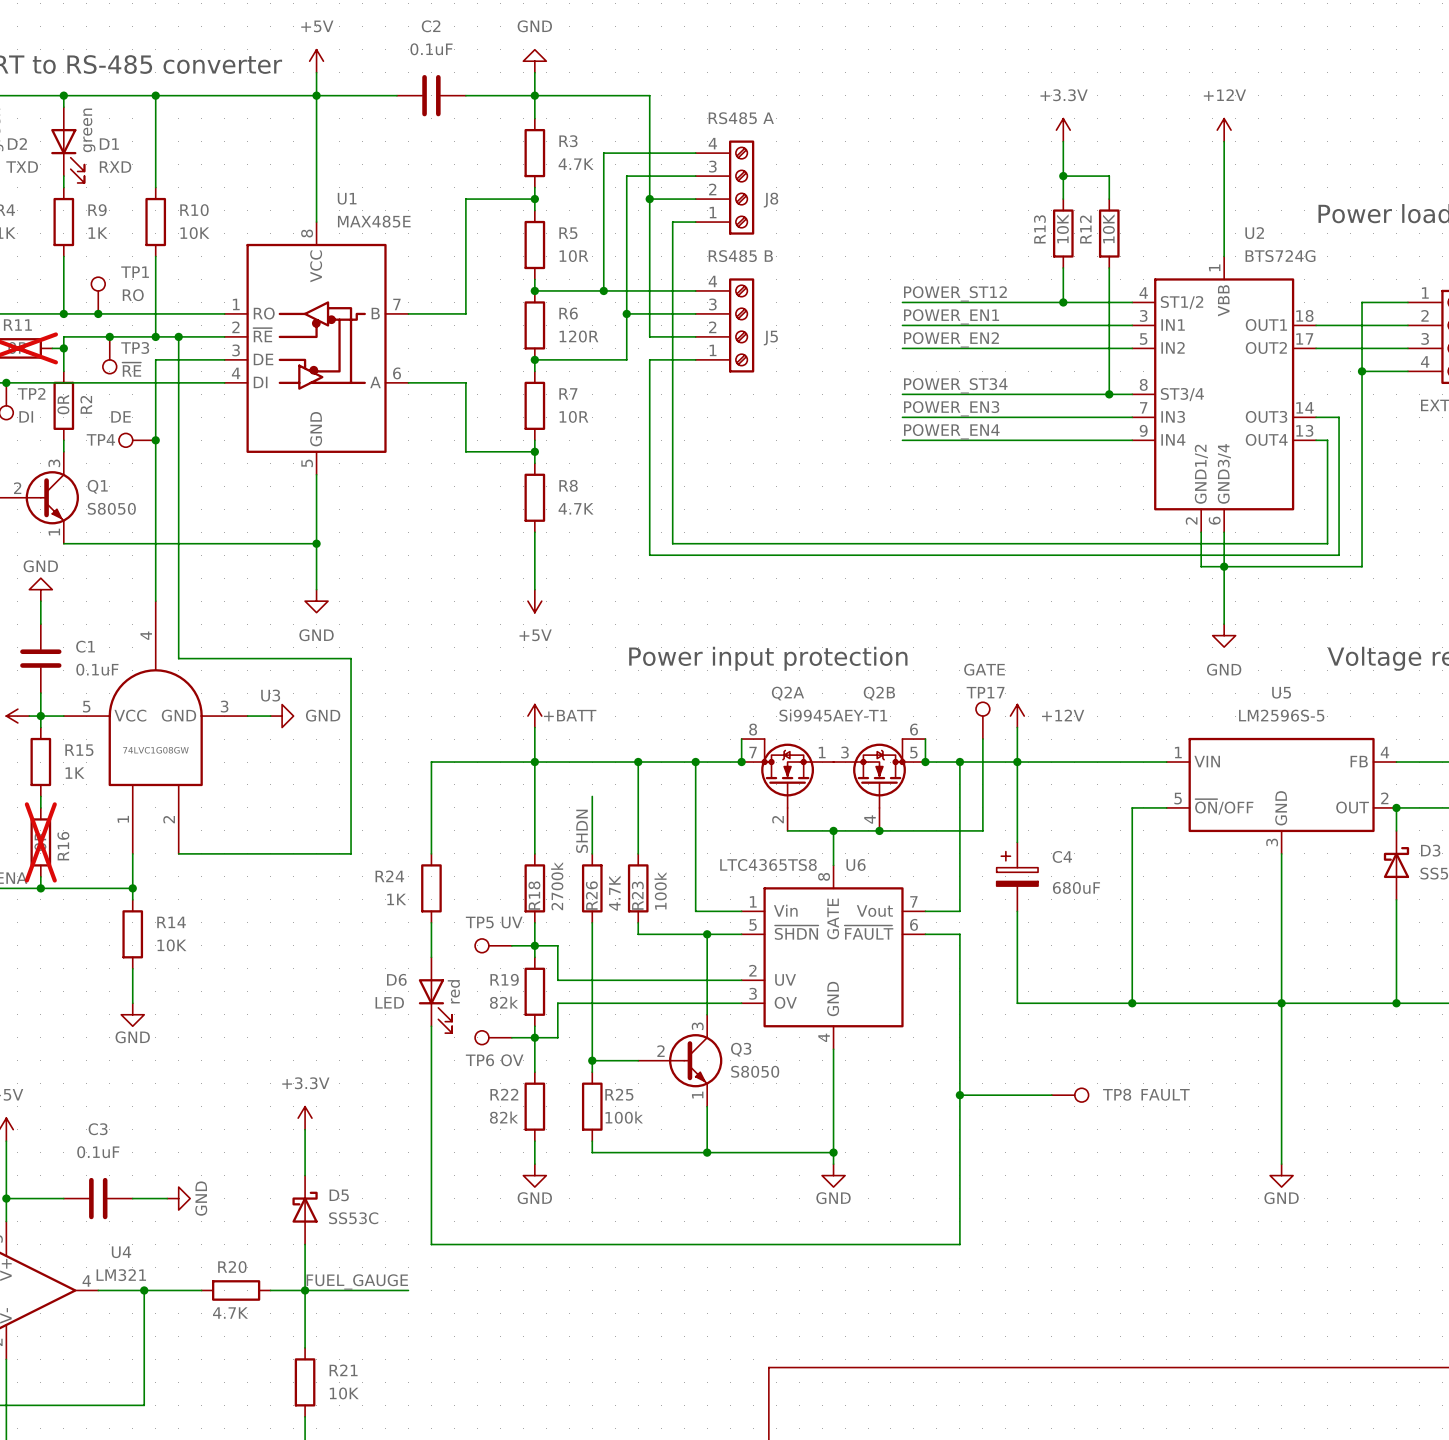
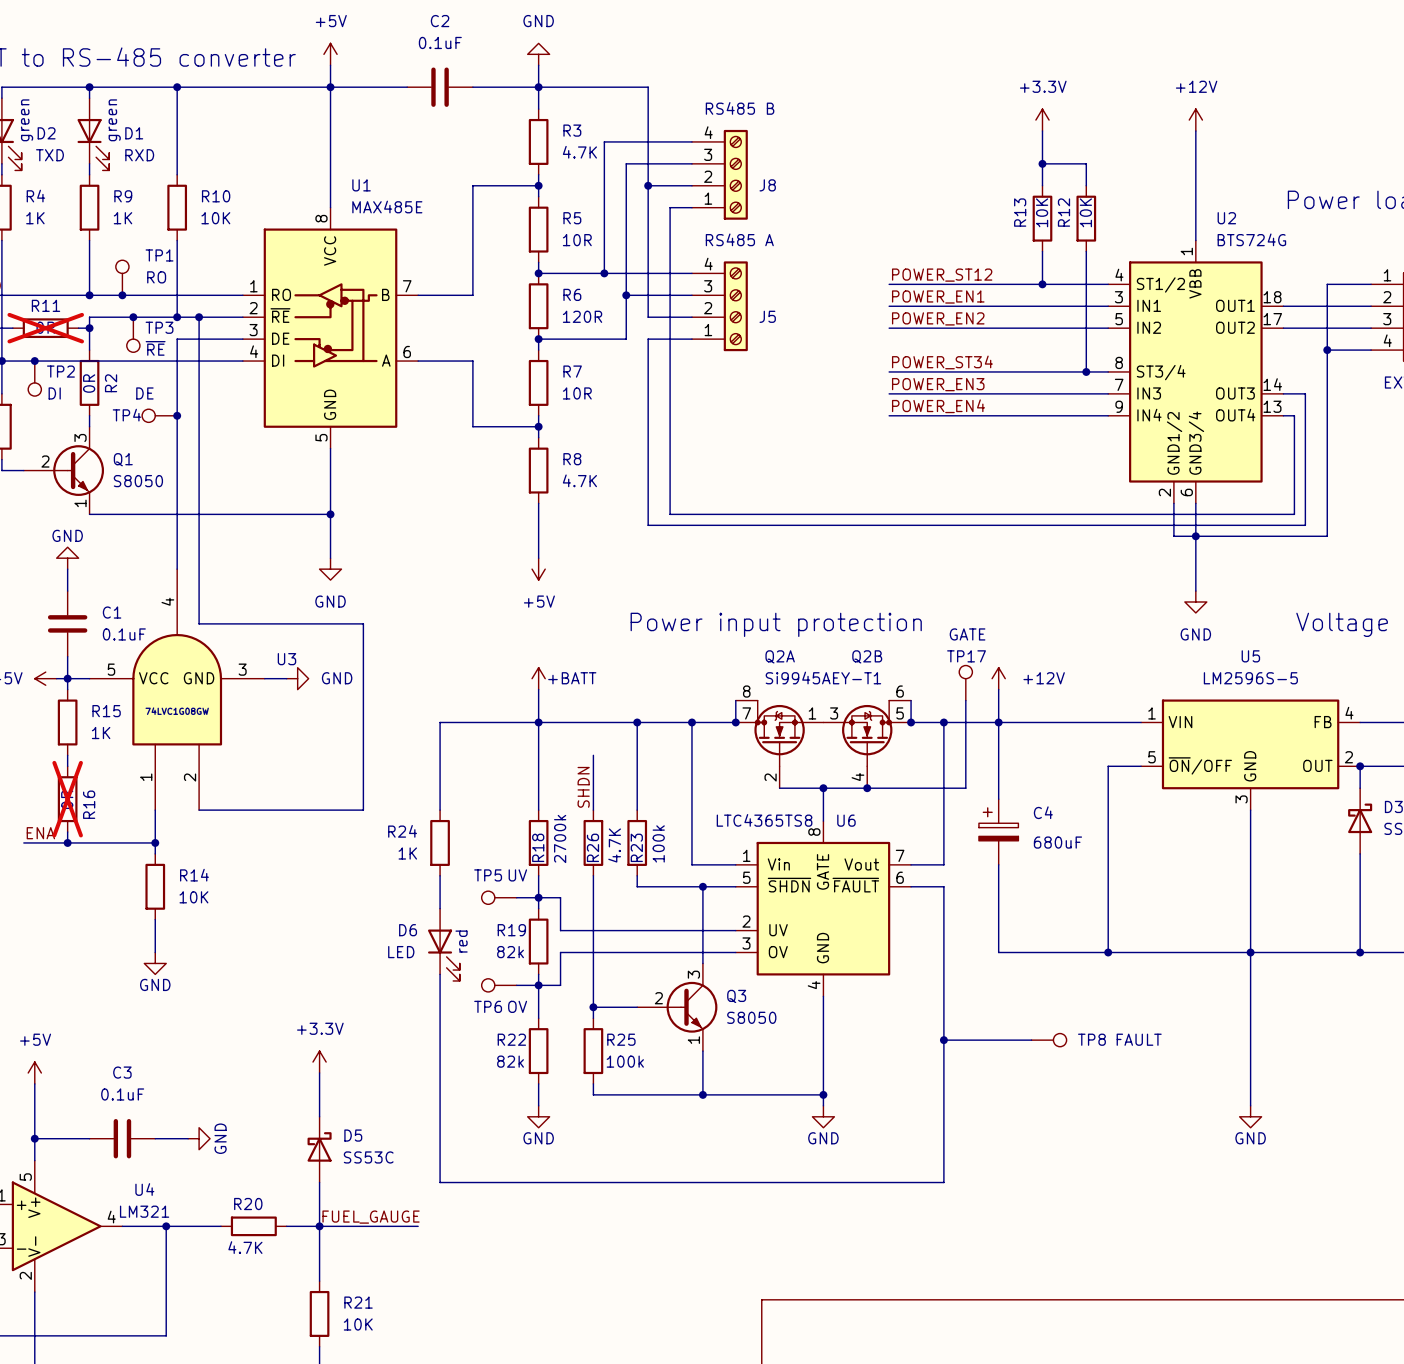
J8 value: RS485 A (741, 118) -> RS485 B (740, 108)
J5 value: RS485 B (740, 256) -> RS485 A (739, 239)

